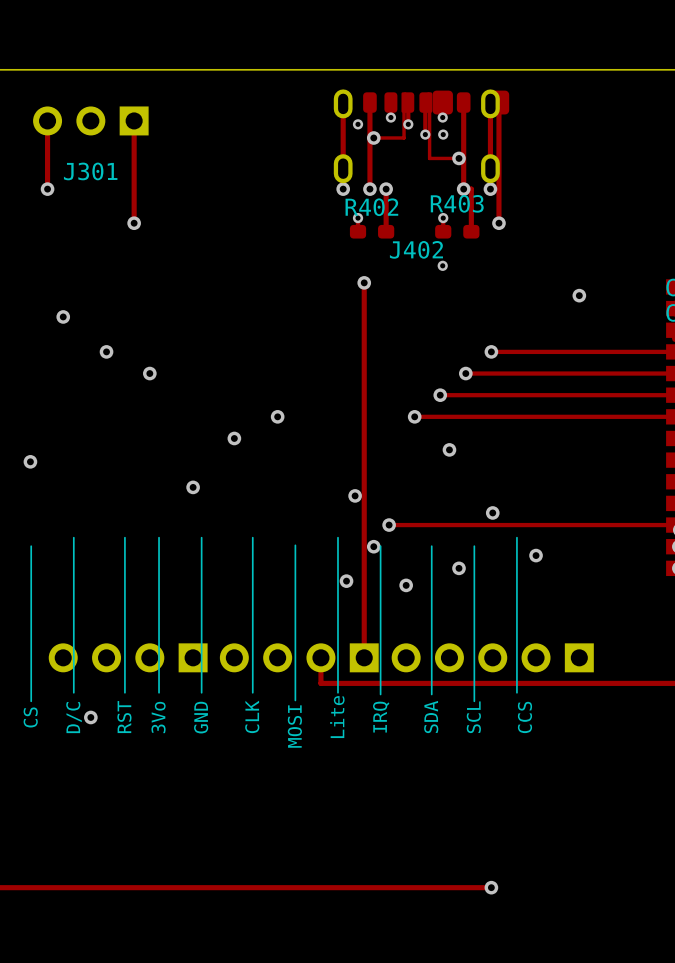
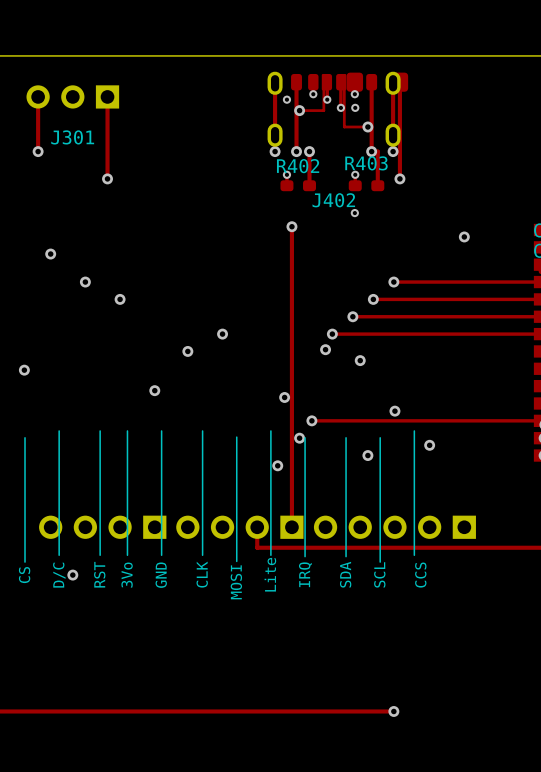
via: none -> (325, 349)
via: (406, 585) -> none

